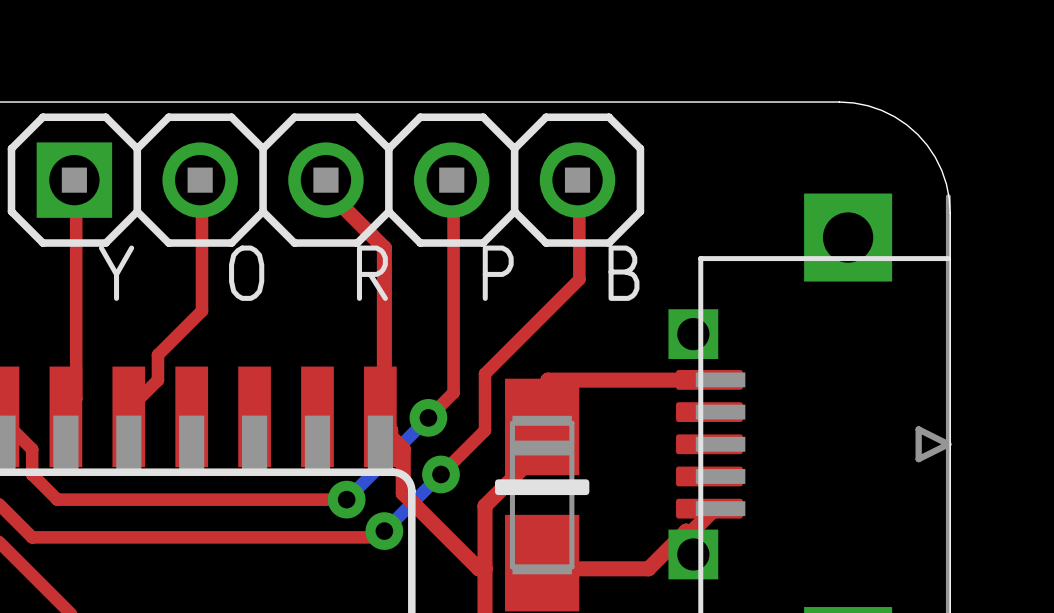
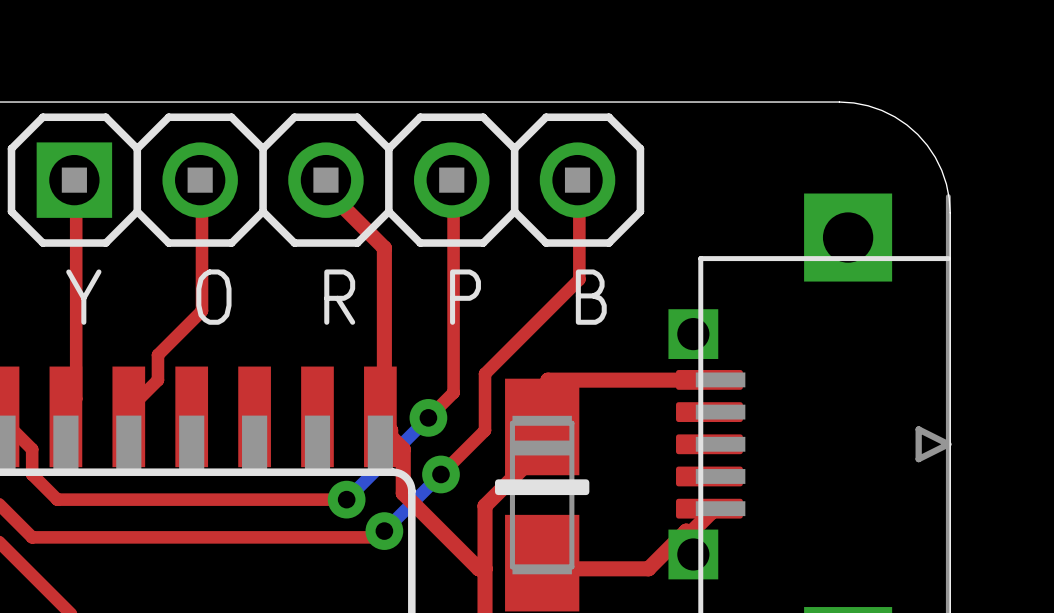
text position: Y (116, 273) -> Y (83, 297)
text position: O (246, 273) -> O (213, 297)
text position: R (372, 273) -> R (339, 297)
text position: P (498, 273) -> P (465, 297)
text position: B (624, 273) -> B (591, 297)

